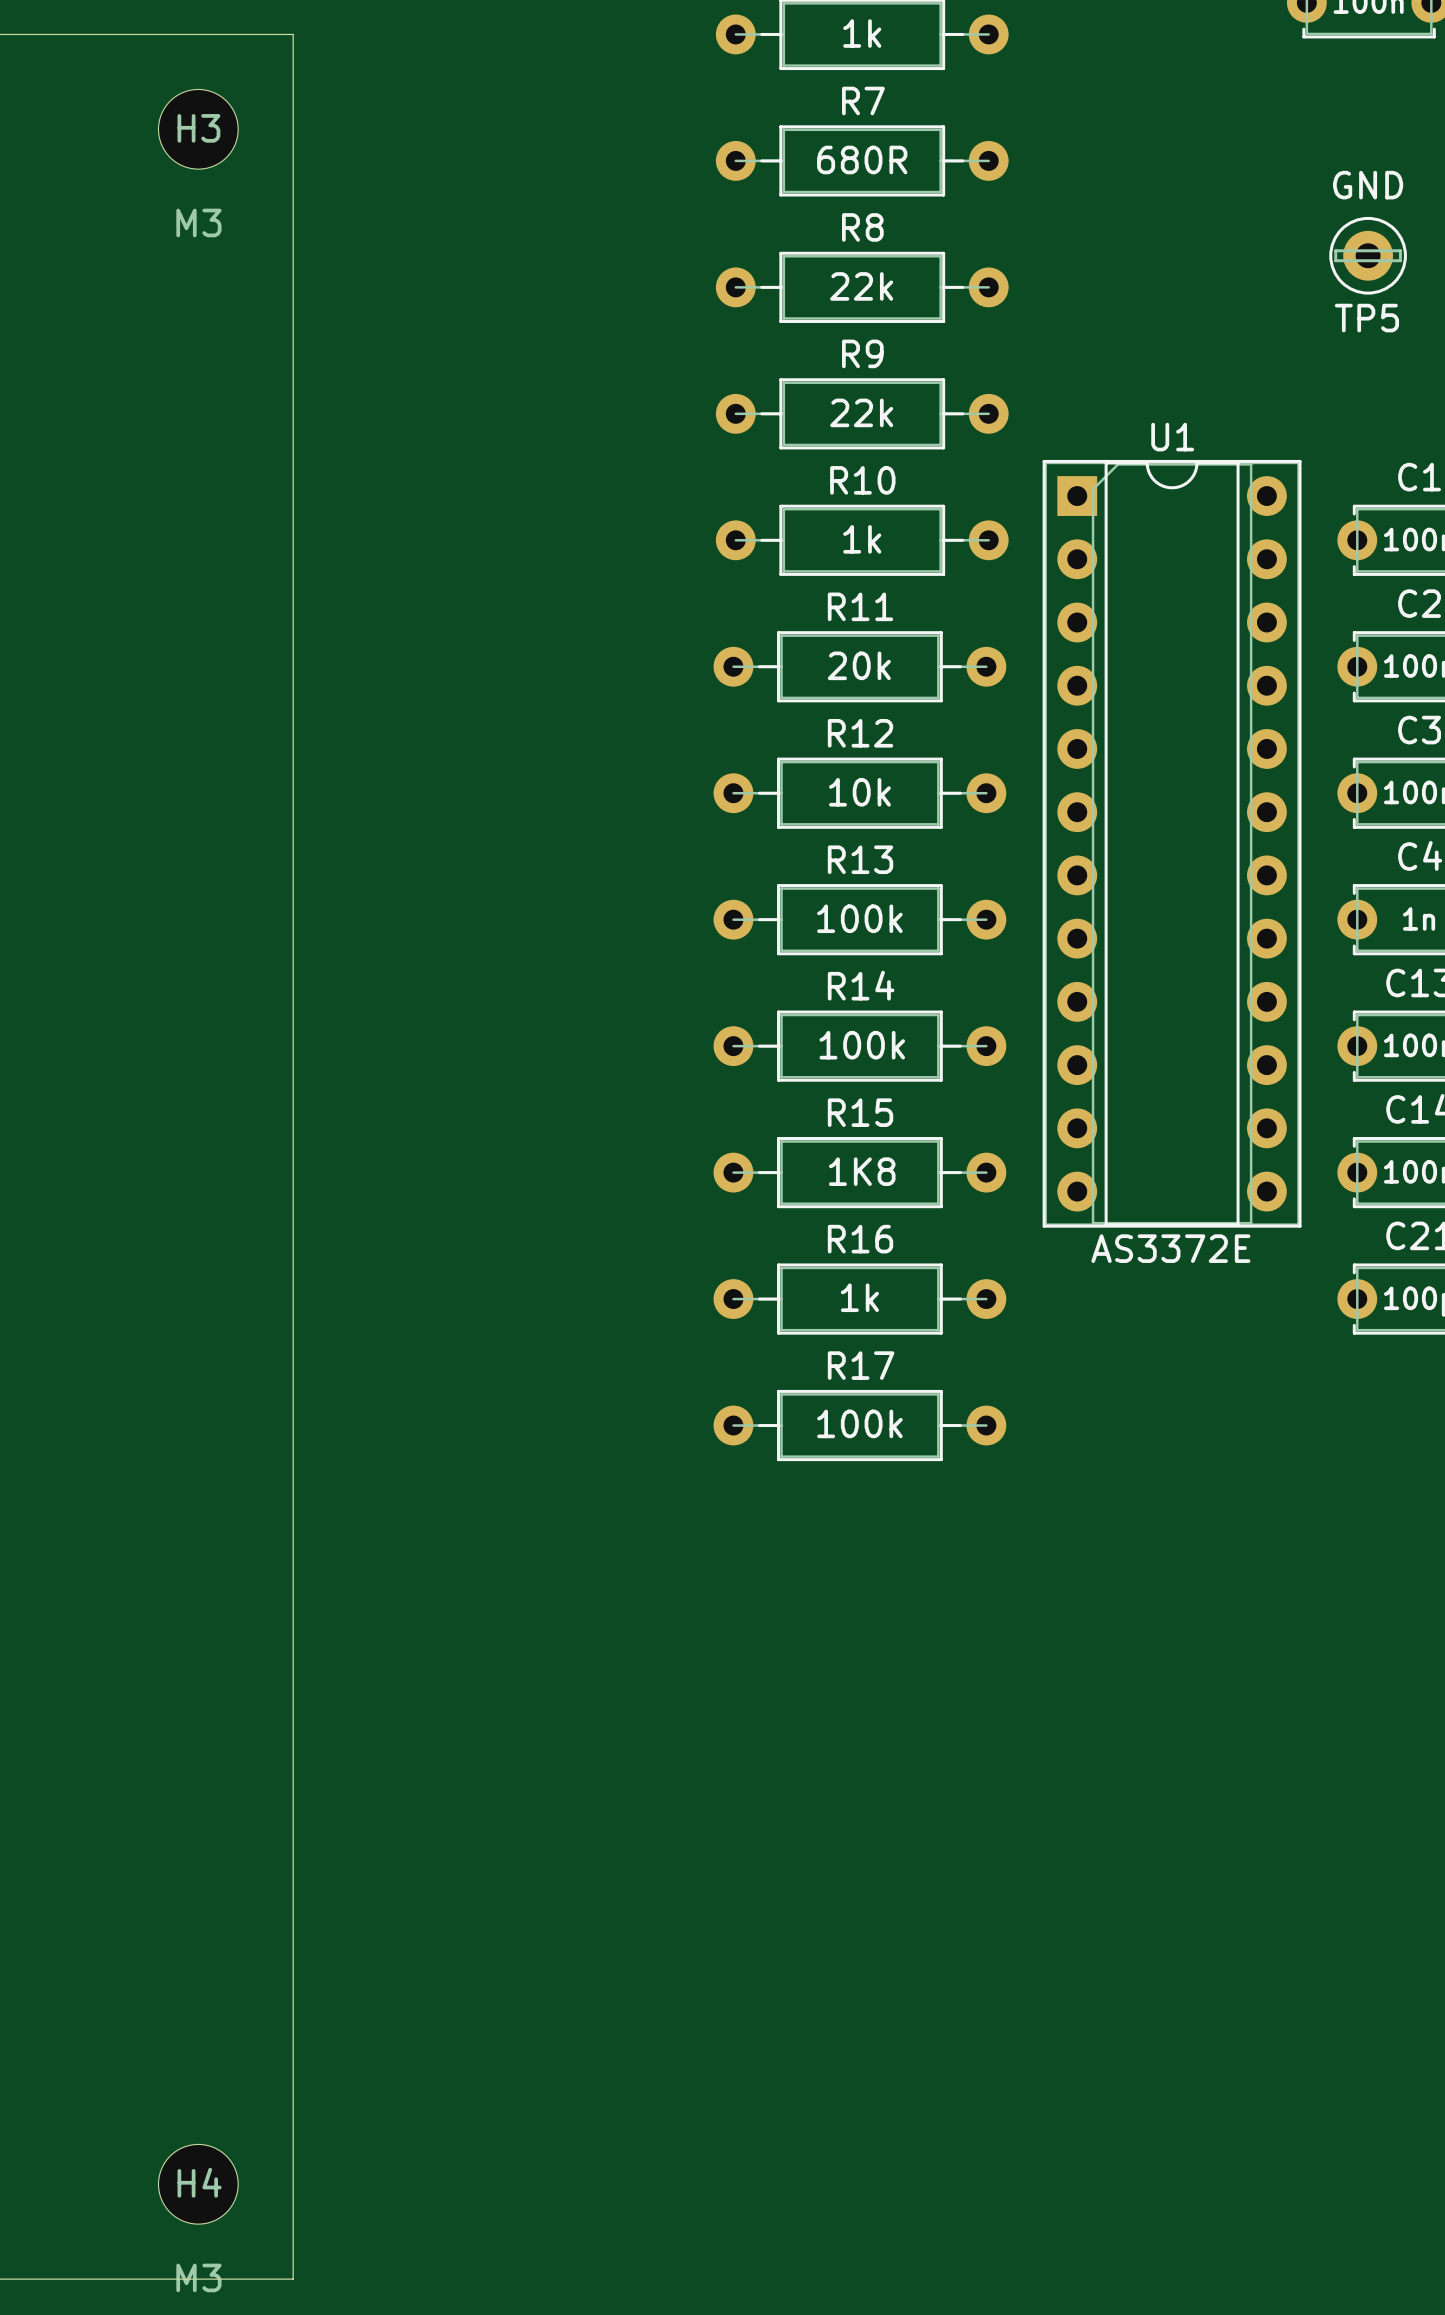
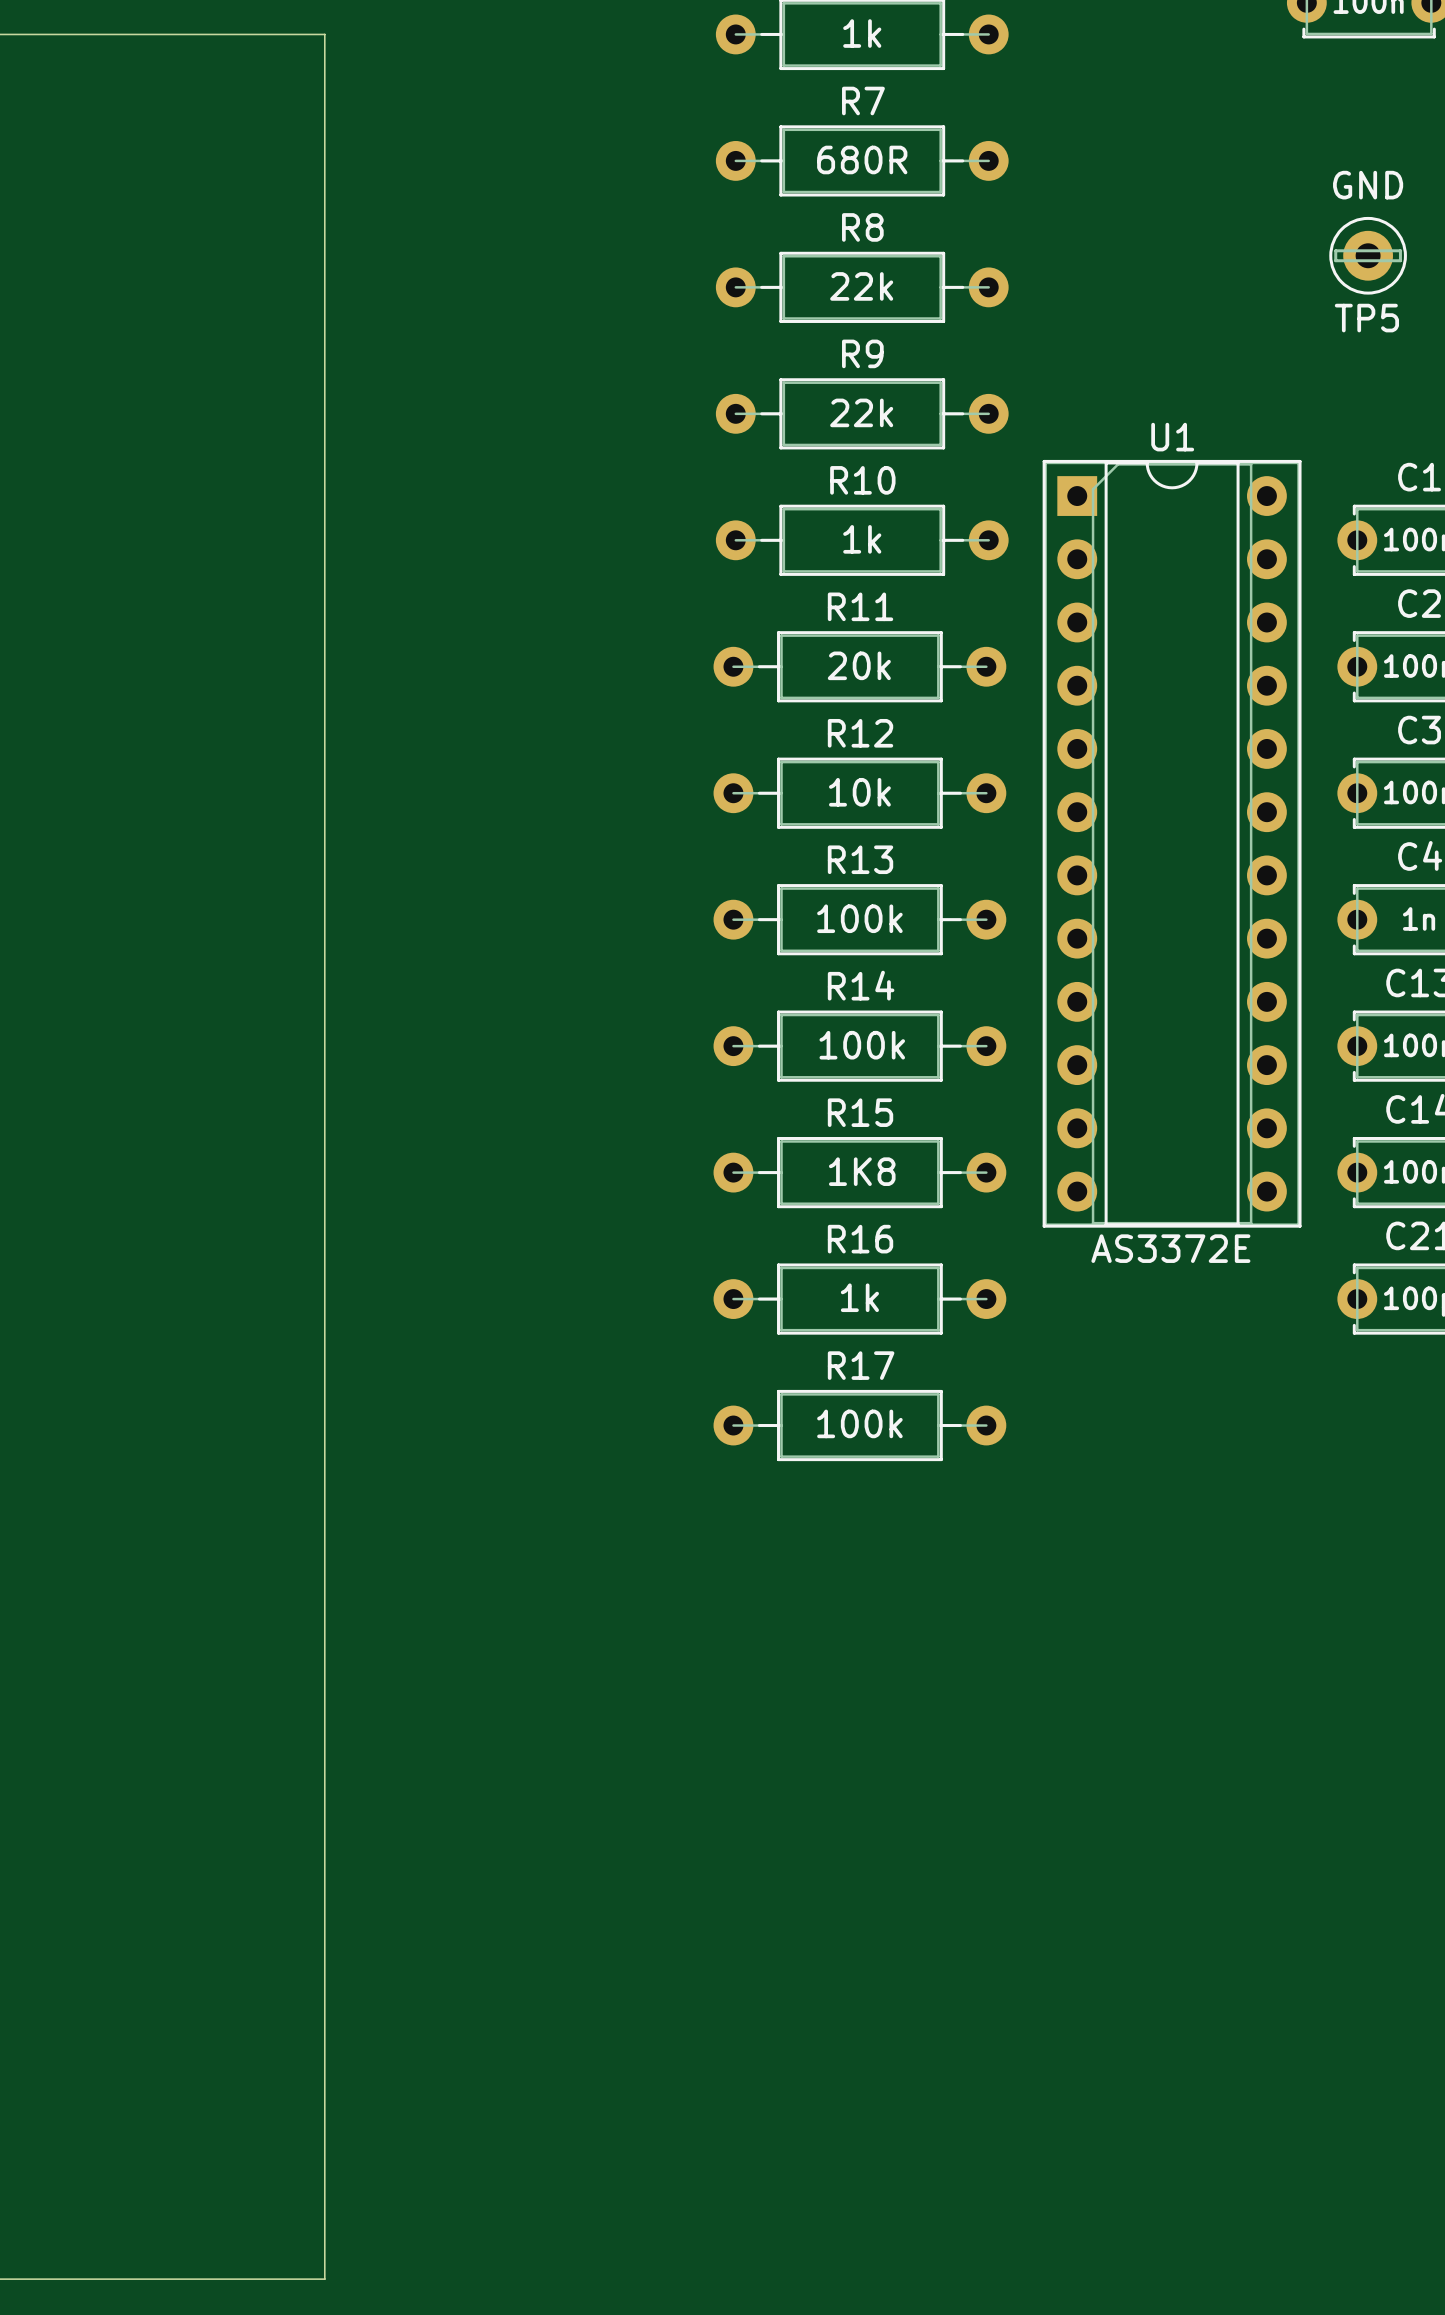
board edge: (293, 34) (293, 2279) -> (293, 34) (324, 34) (324, 2279) (293, 2279)
H3: M3 (198, 129) -> none
H4: M3 (198, 2184) -> none

